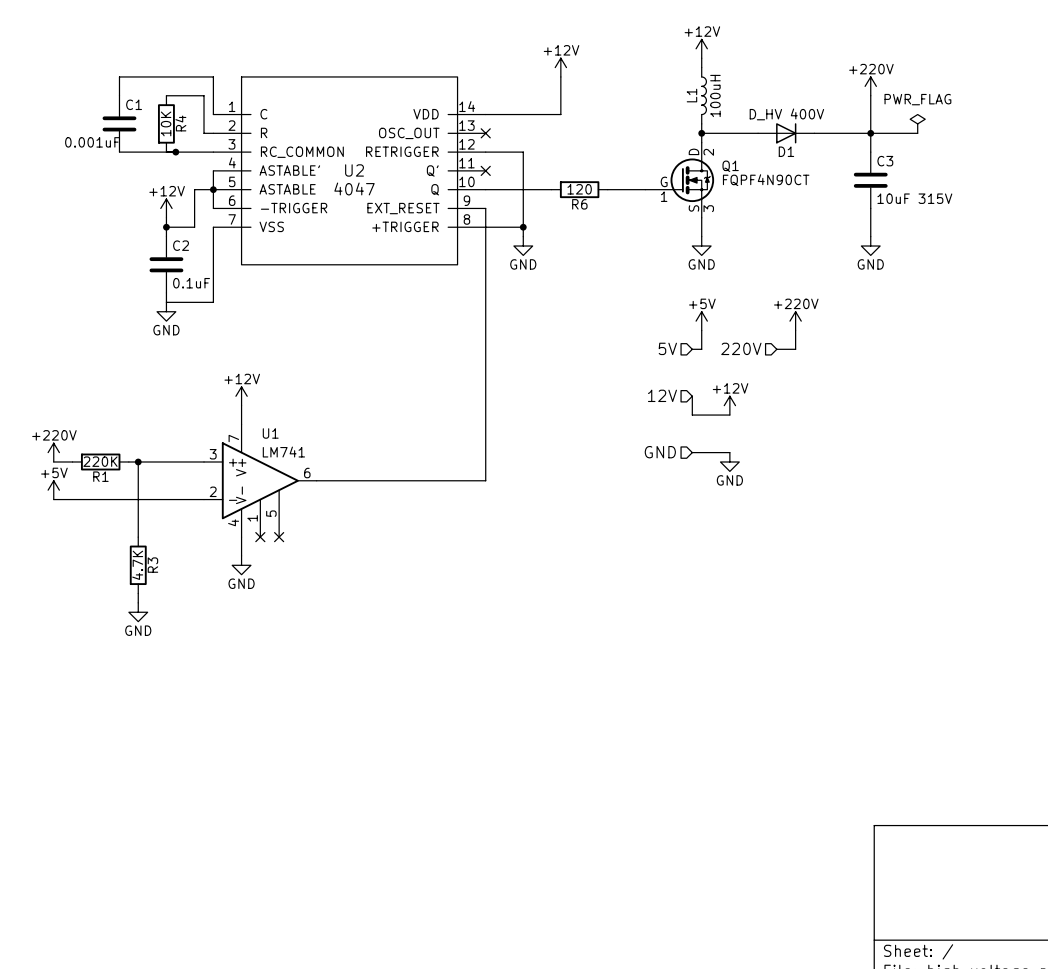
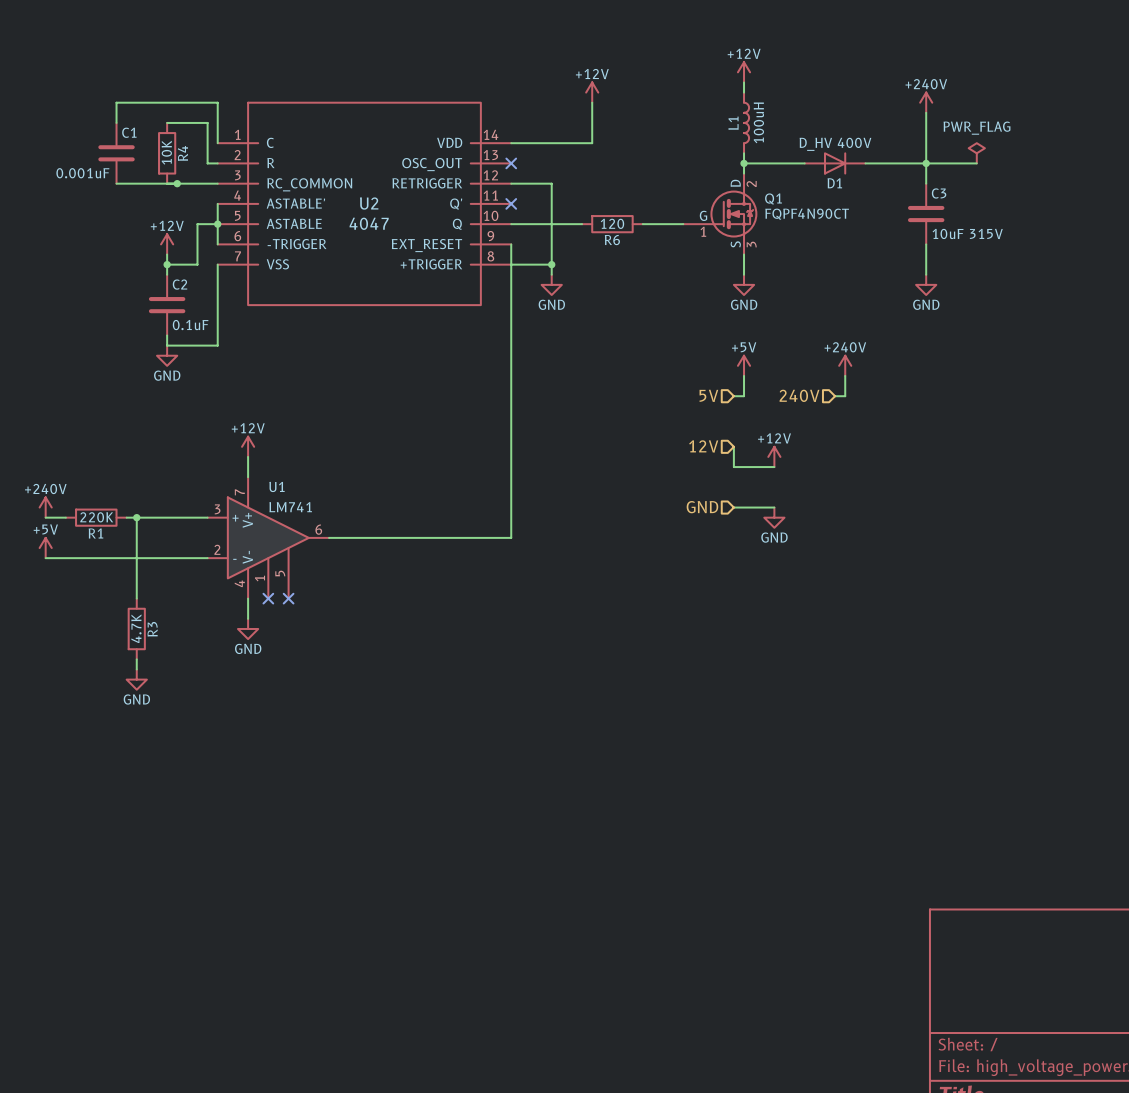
power symbol: none -> +240V (926, 102)
power symbol: +220V (870, 86) -> none
power symbol: +220V (795, 321) -> +240V (845, 365)
hierarchical label: 220V (741, 348) -> 240V (799, 395)
wire: (776, 349) (786, 349) -> none
power symbol: +220V (53, 452) -> +240V (45, 507)

